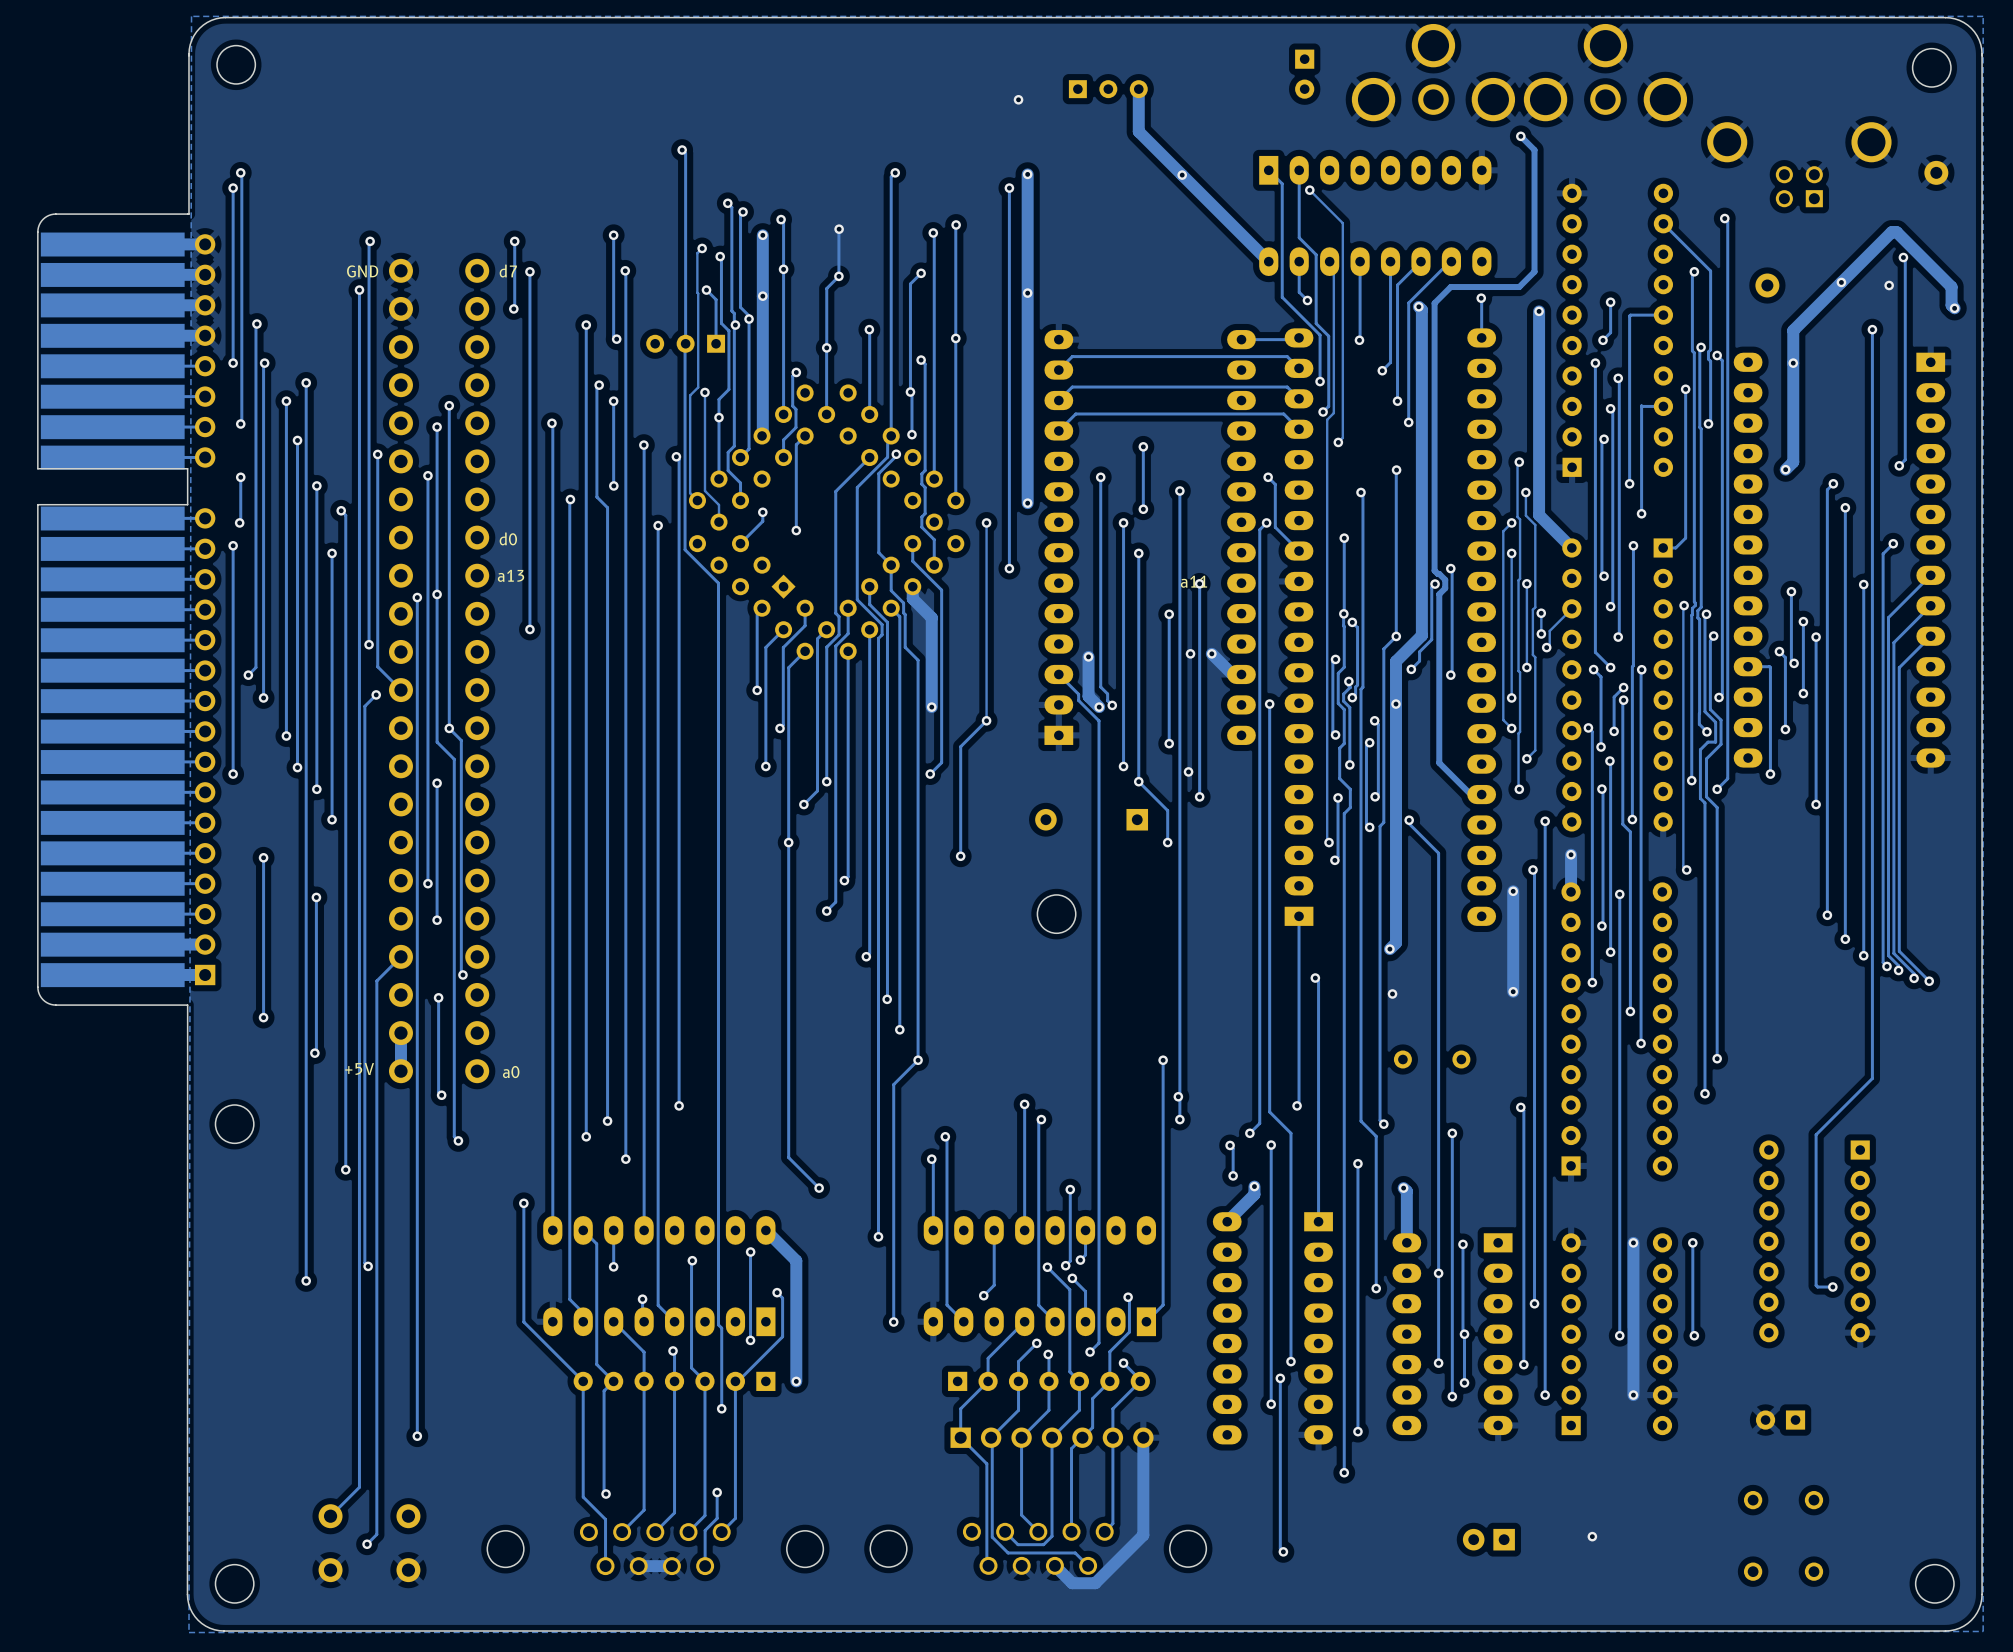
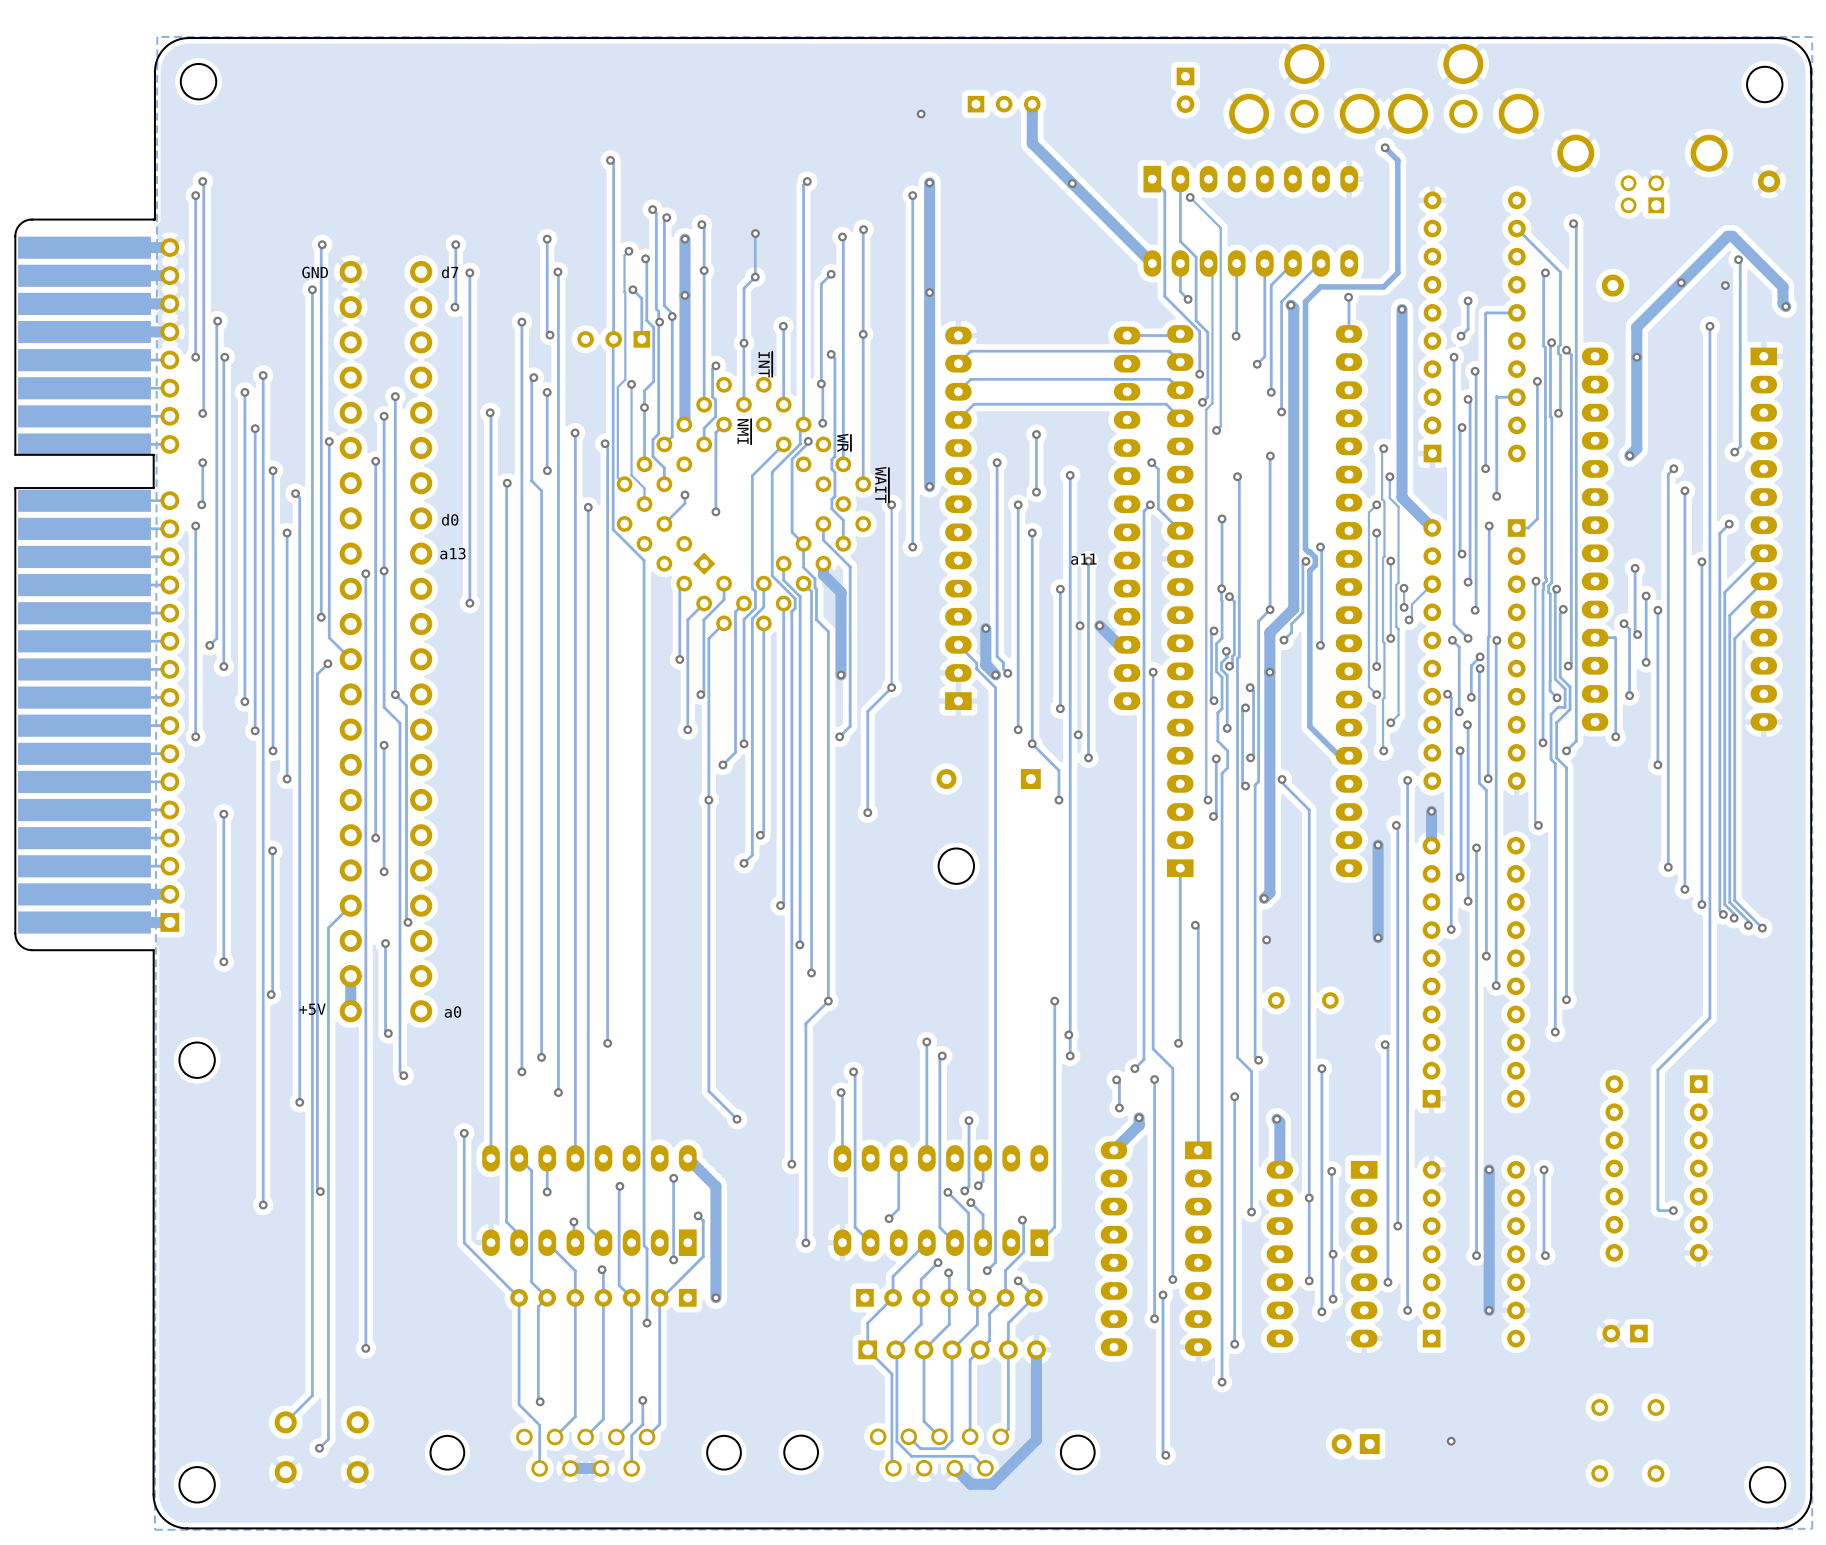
text: none -> ~{INT} (765, 364)
text: none -> ~{NMI} (744, 431)
text: none -> ~{WR} (844, 442)
text: none -> ~{WAIT} (882, 485)

